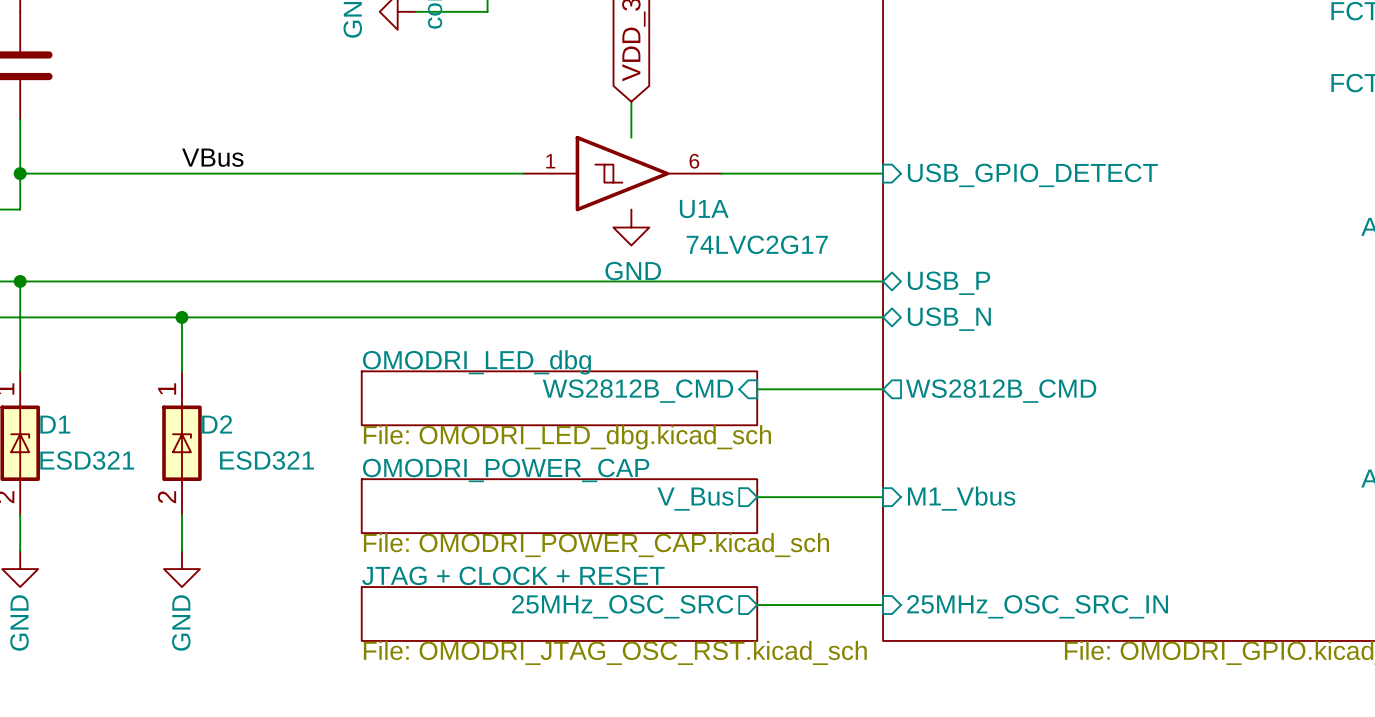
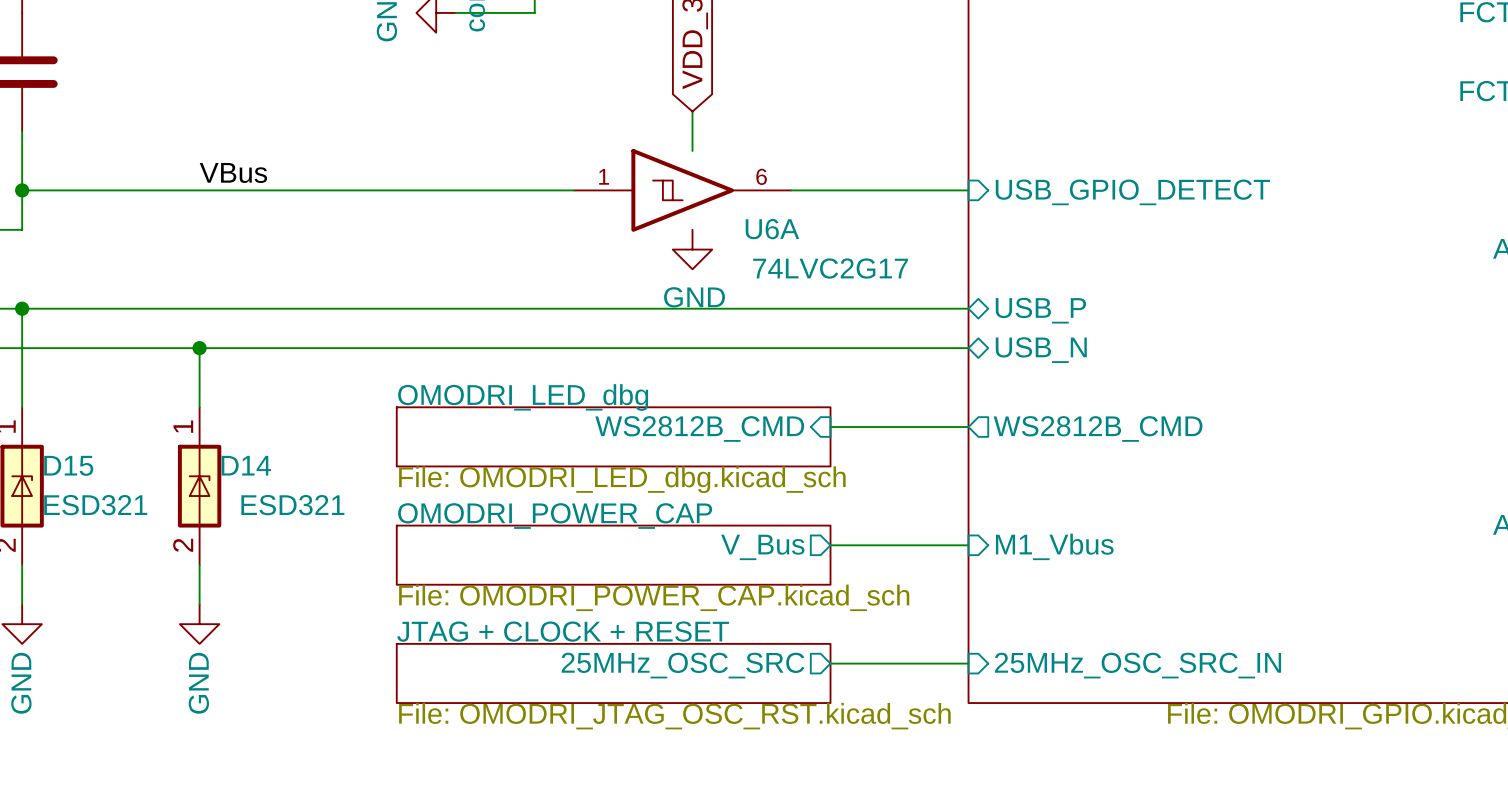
U1A name: U1A (704, 209) -> U6A (772, 229)
D1 name: D1 (55, 424) -> D15 (68, 465)
D2 name: D2 (217, 424) -> D14 (246, 465)

